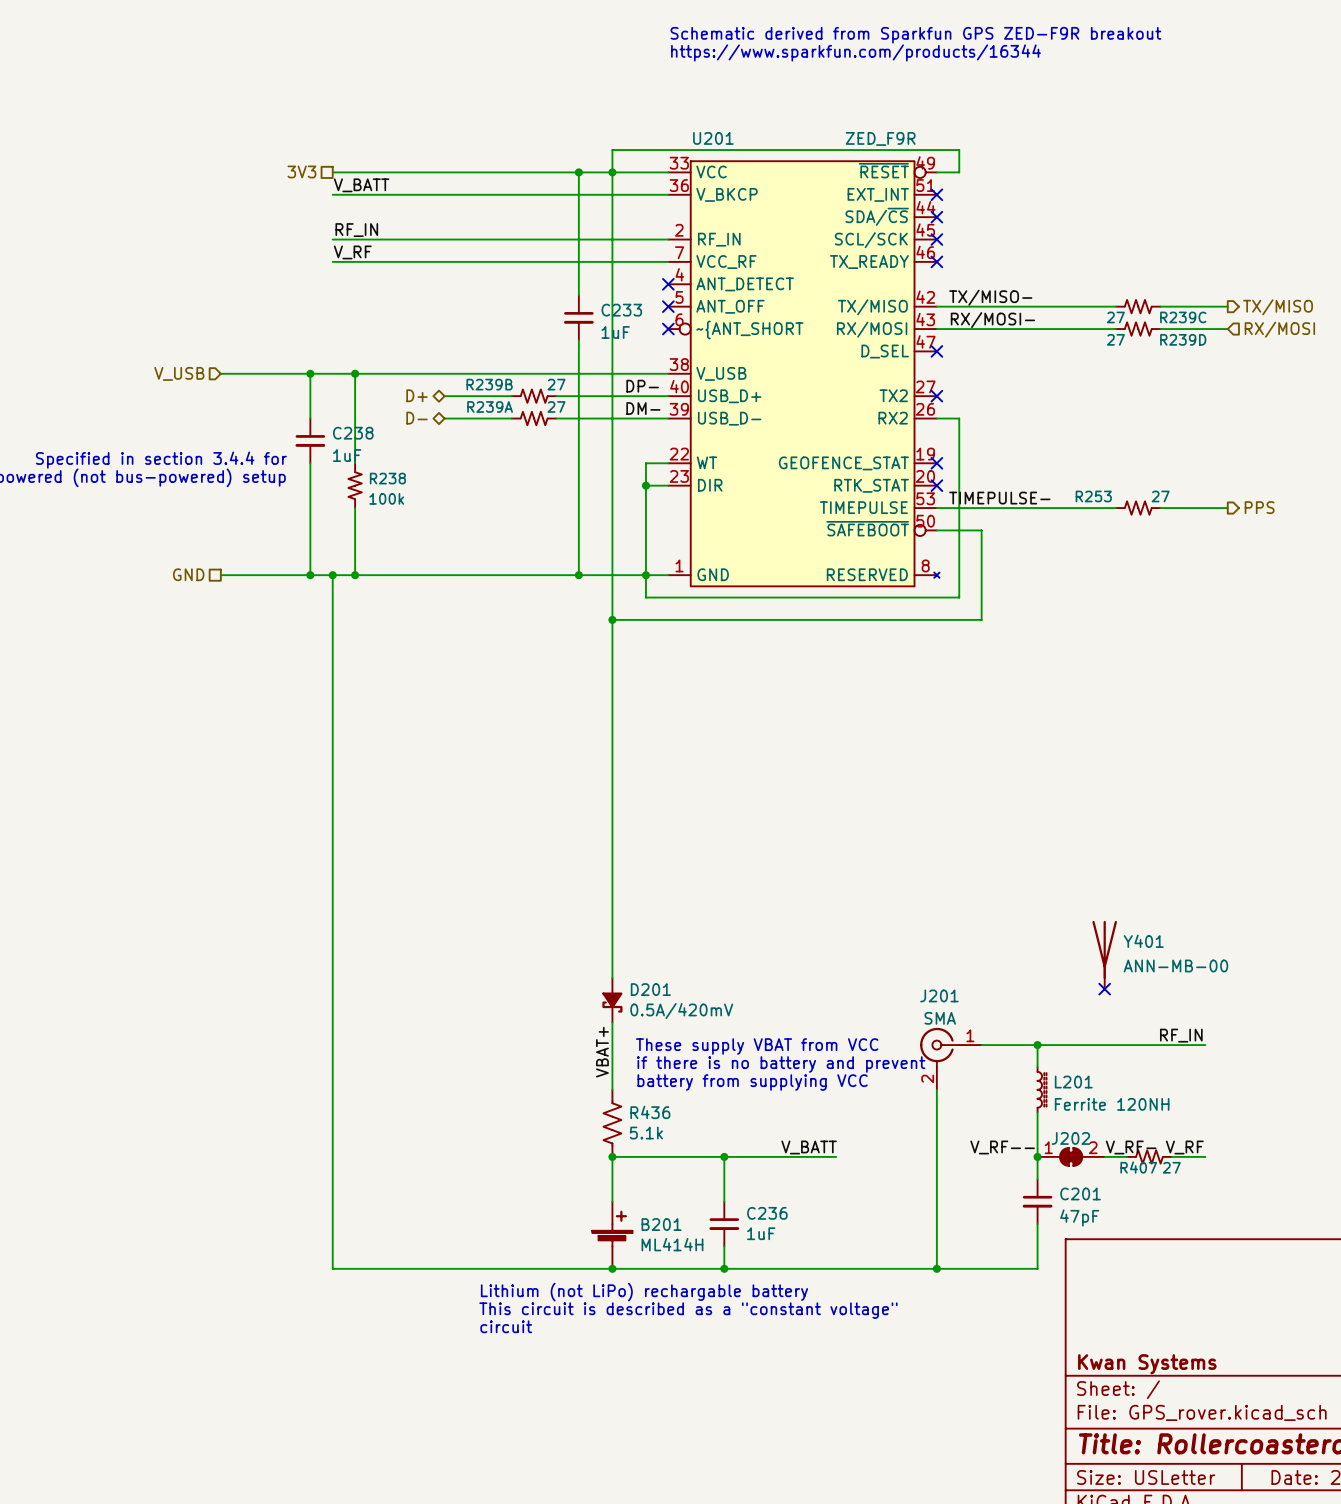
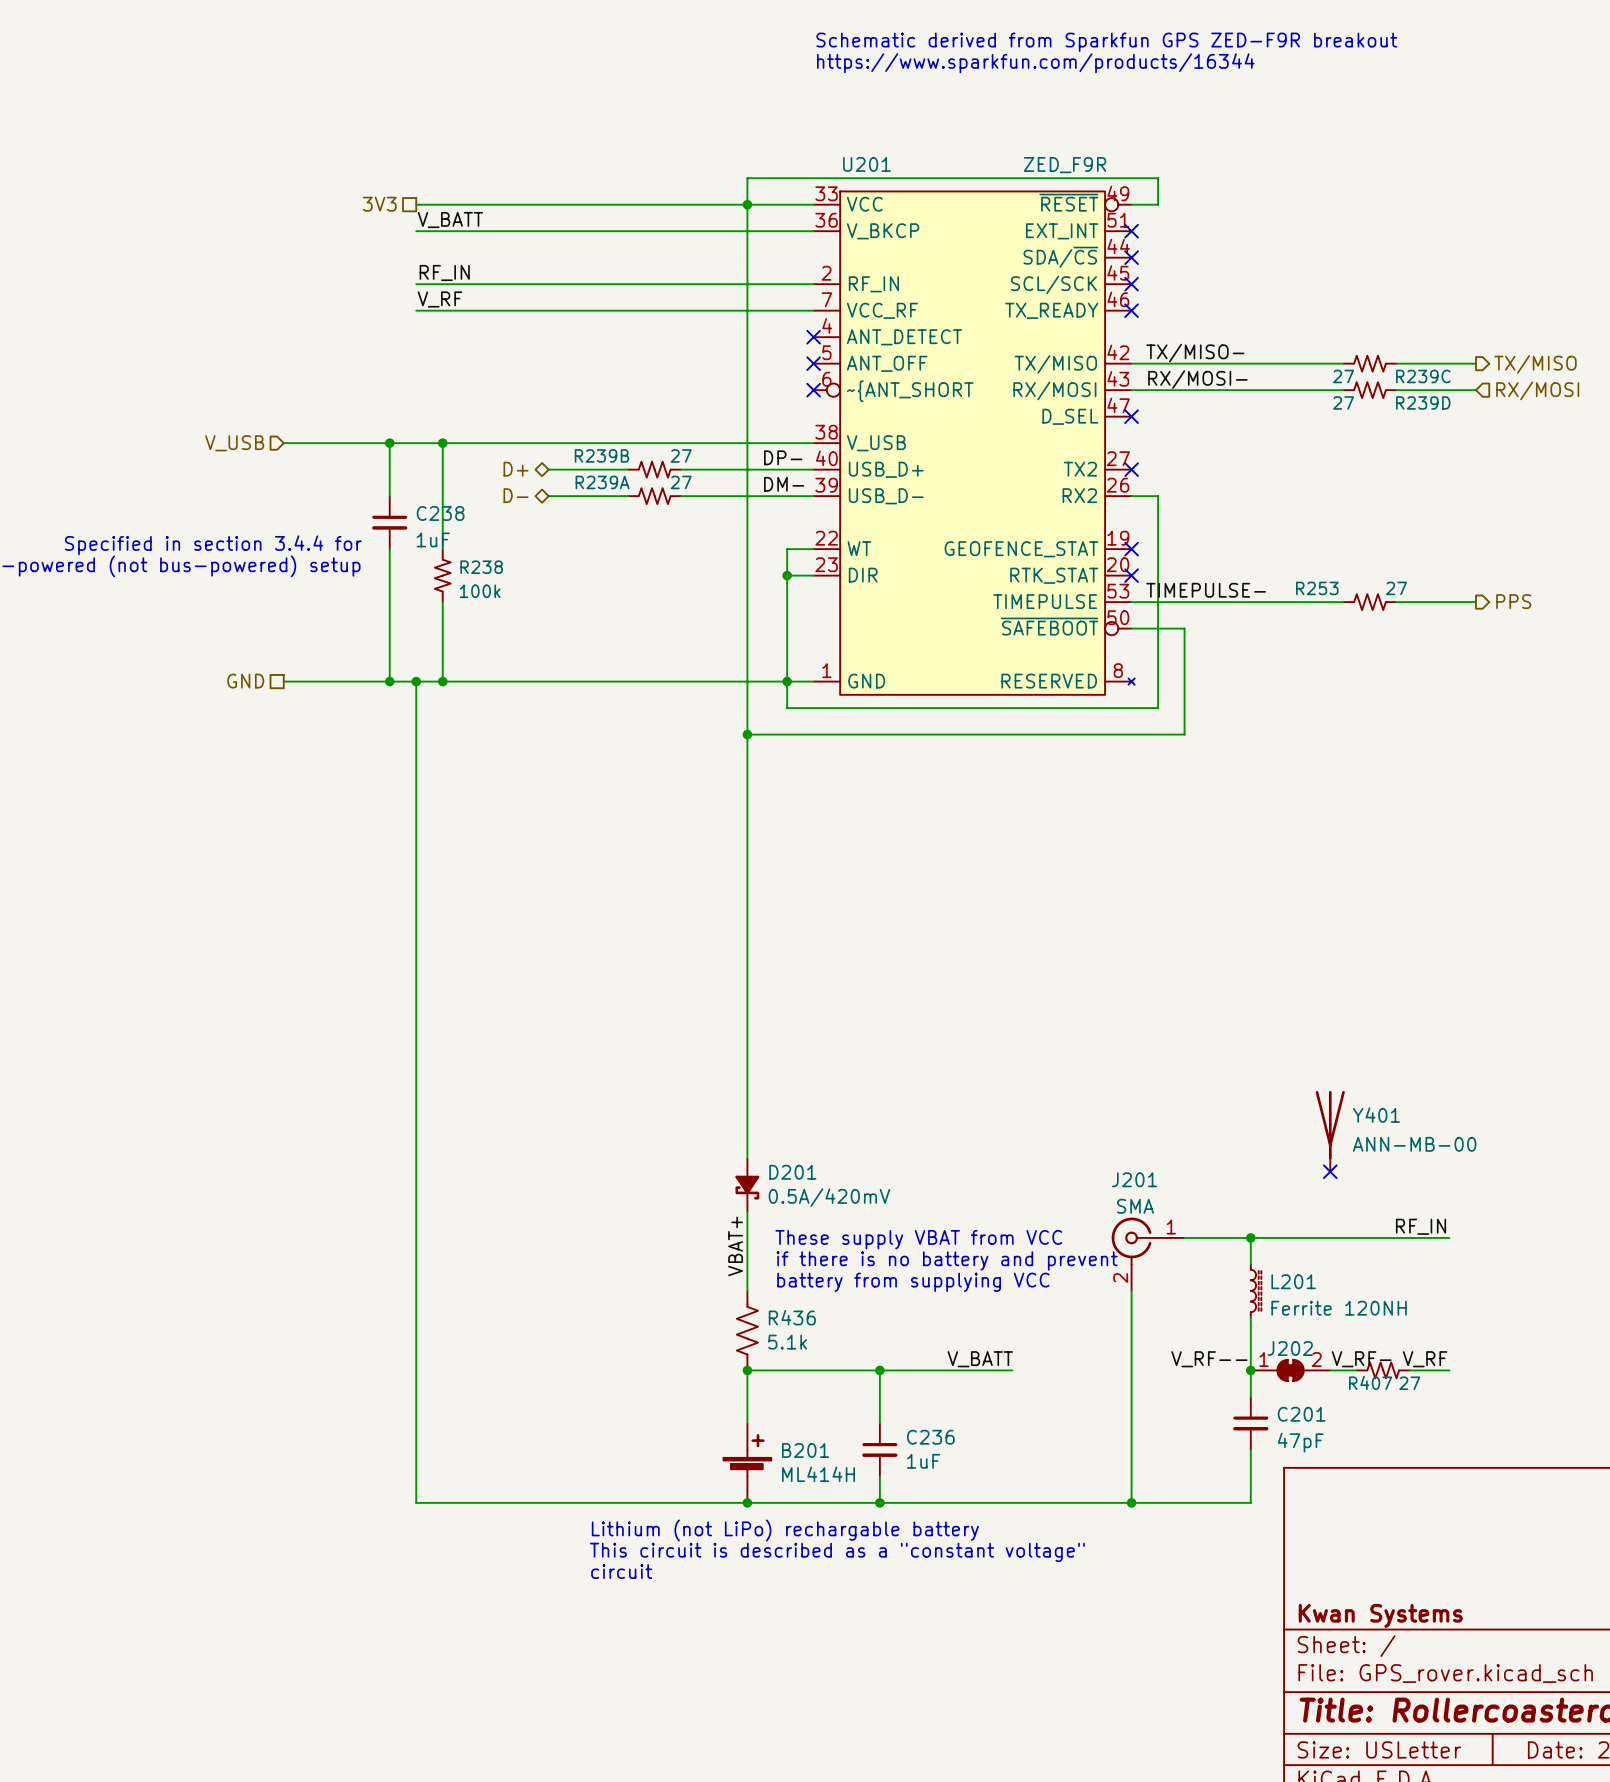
wire: (578, 172) (578, 295) -> none
junction: (578, 172) -> none
C233: 1uF (578, 317) -> none
wire: (578, 340) (578, 575) -> none
junction: (578, 575) -> none

